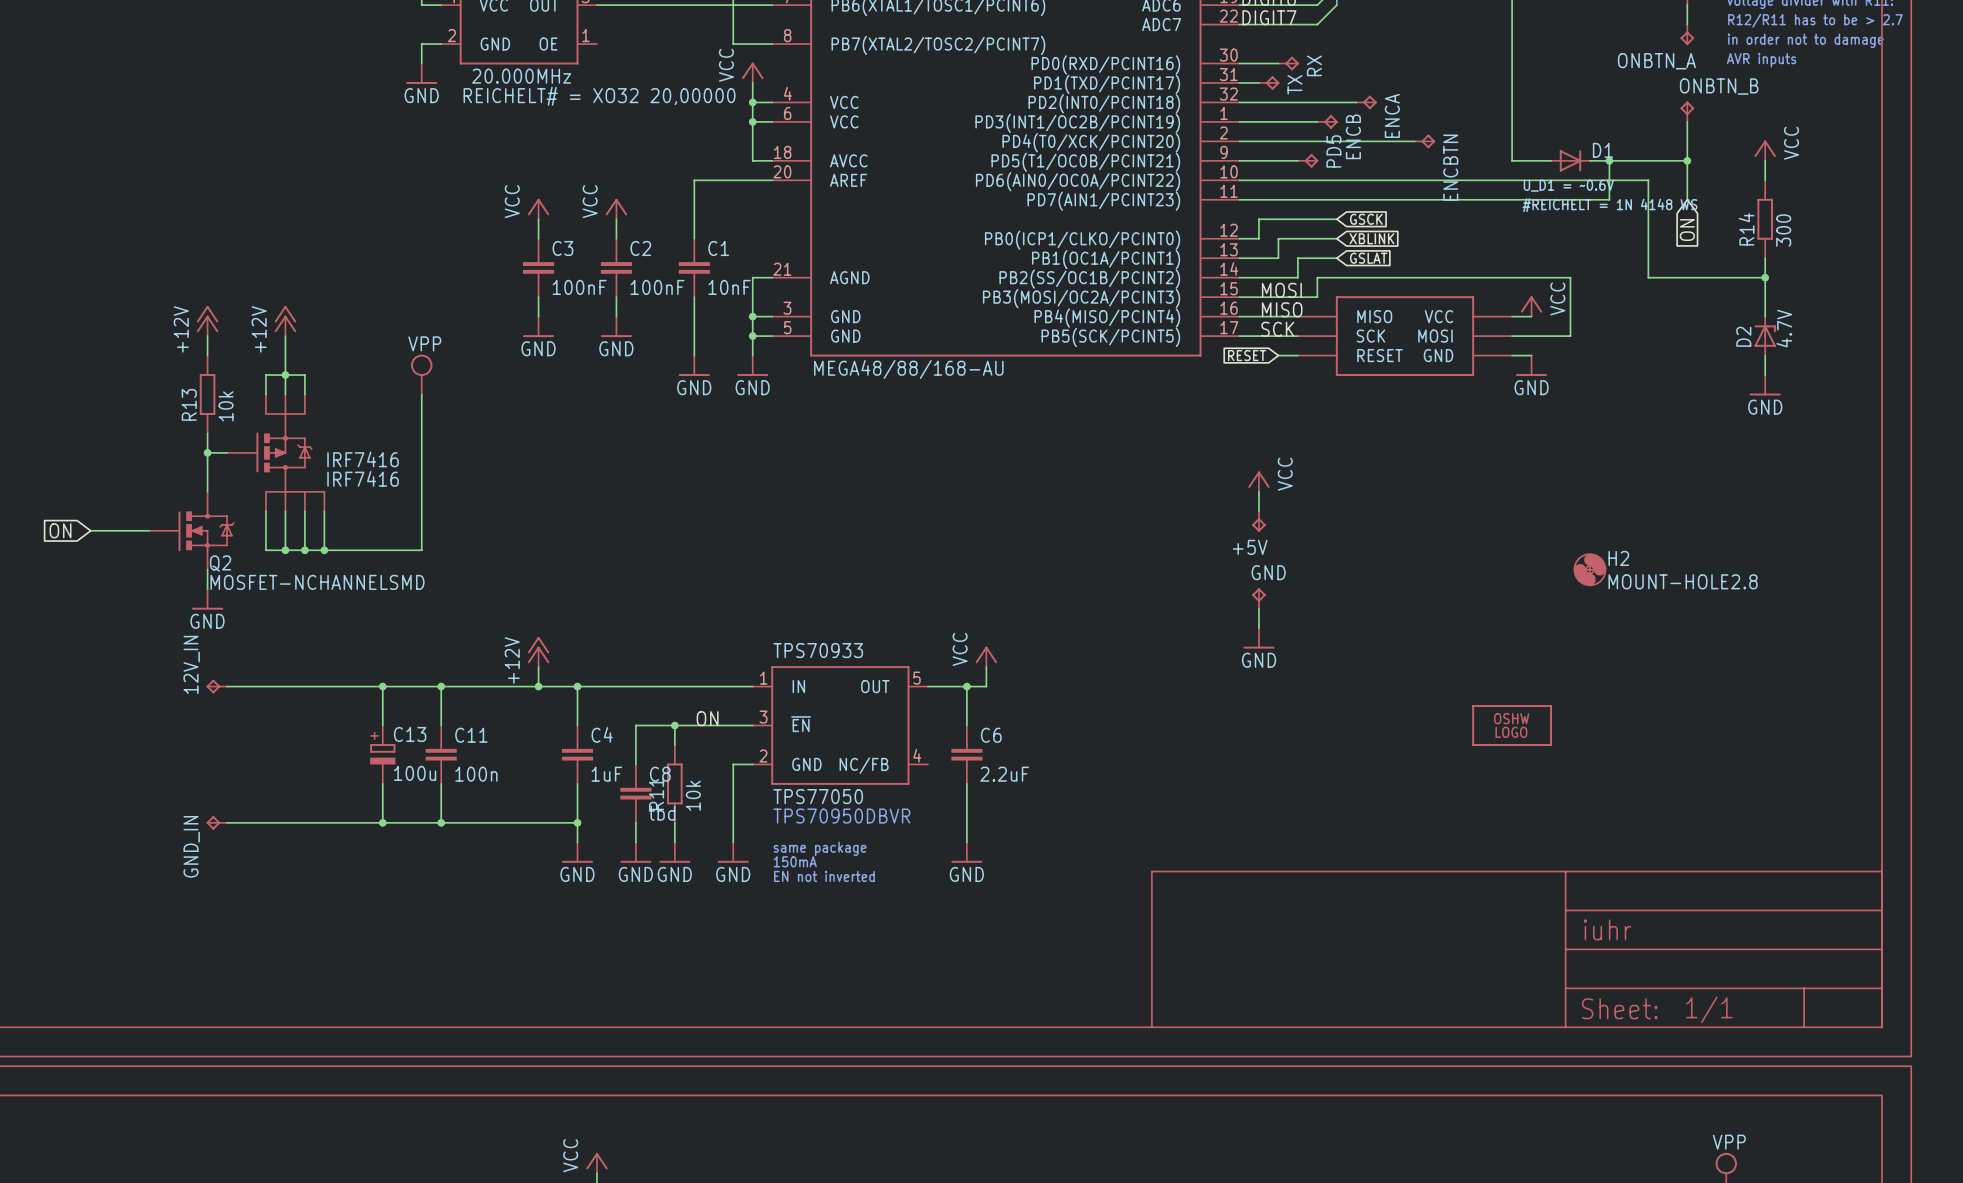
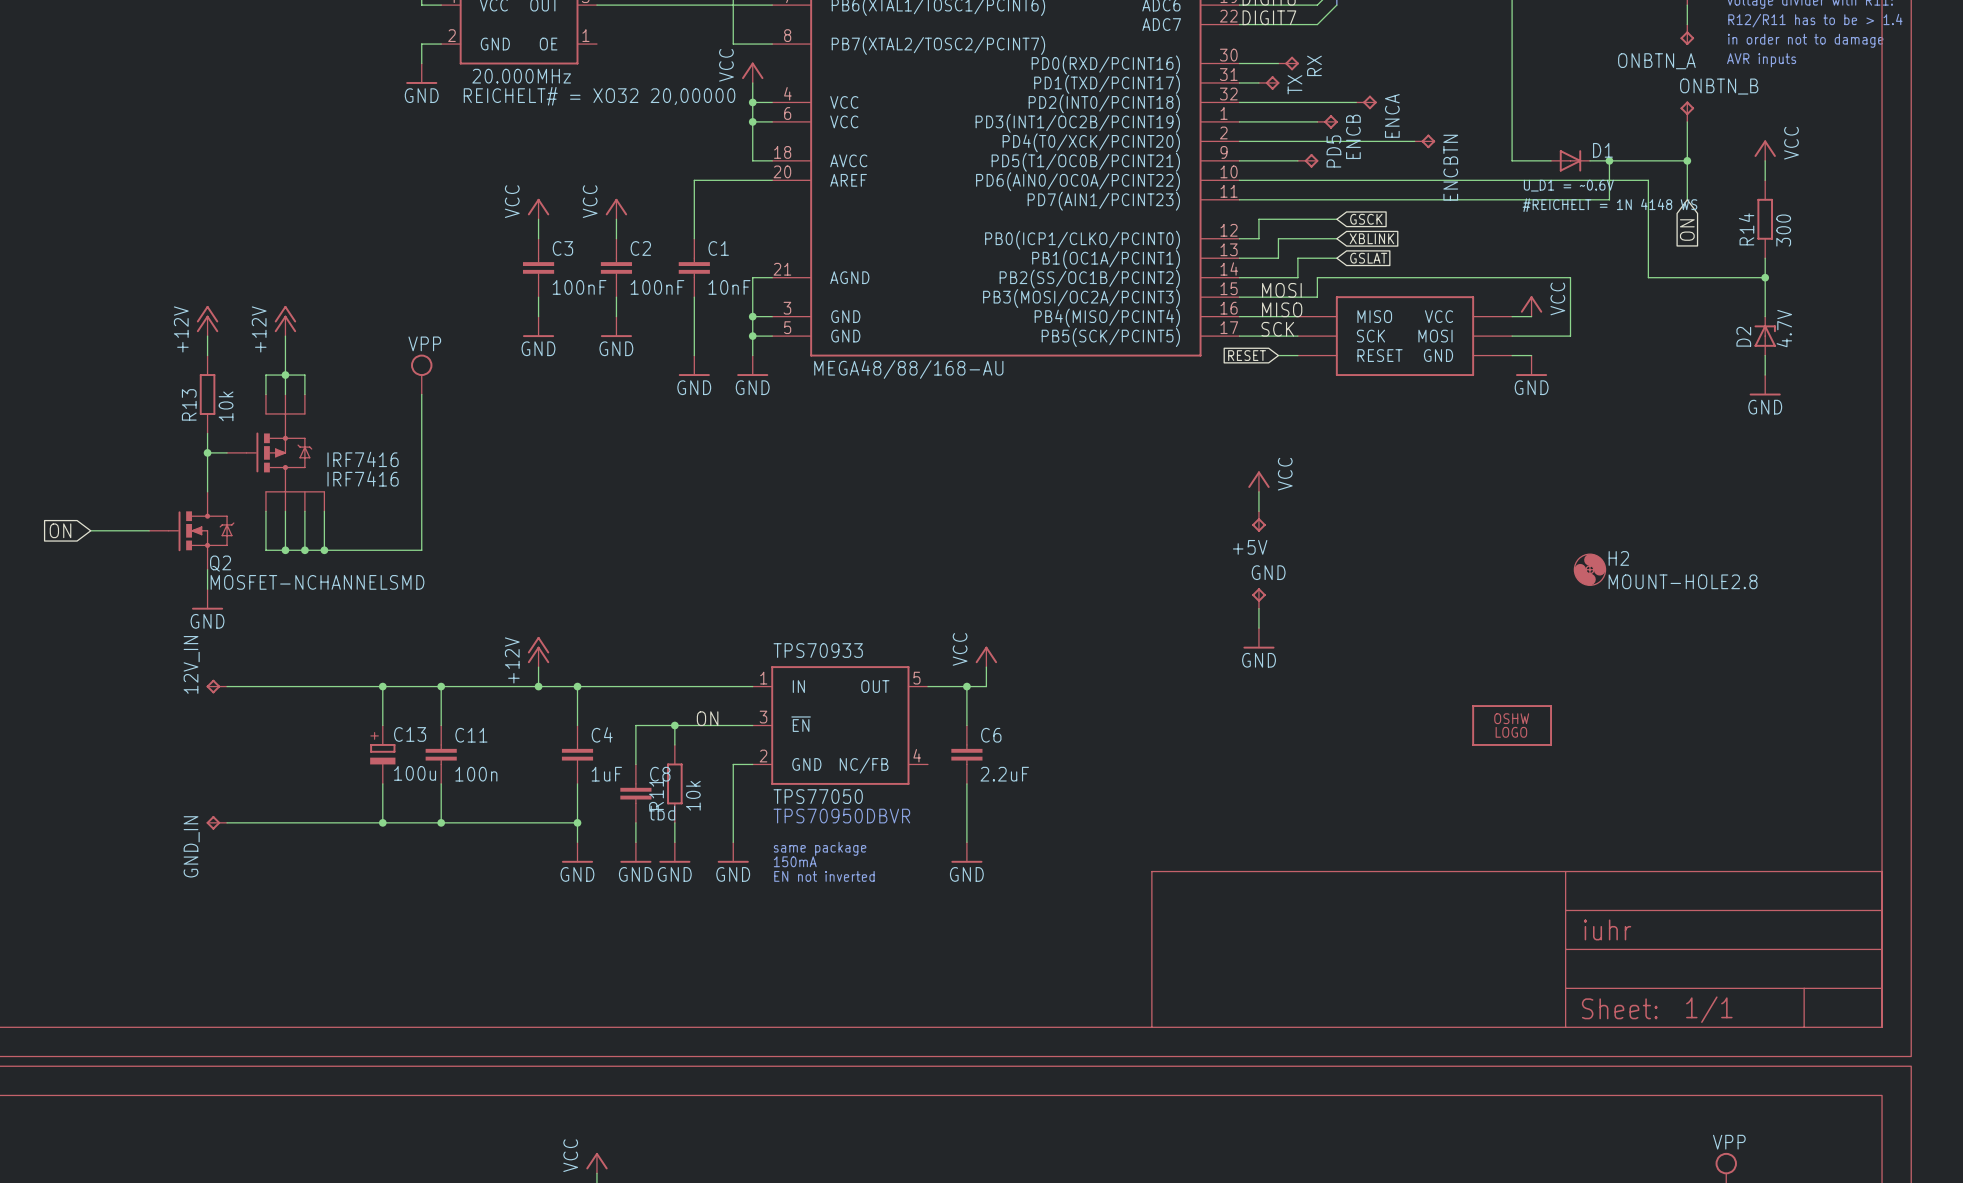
text: R12/R11 has to be > 2.7 (1815, 20) -> R12/R11 has to be > 1.4 (1815, 20)

